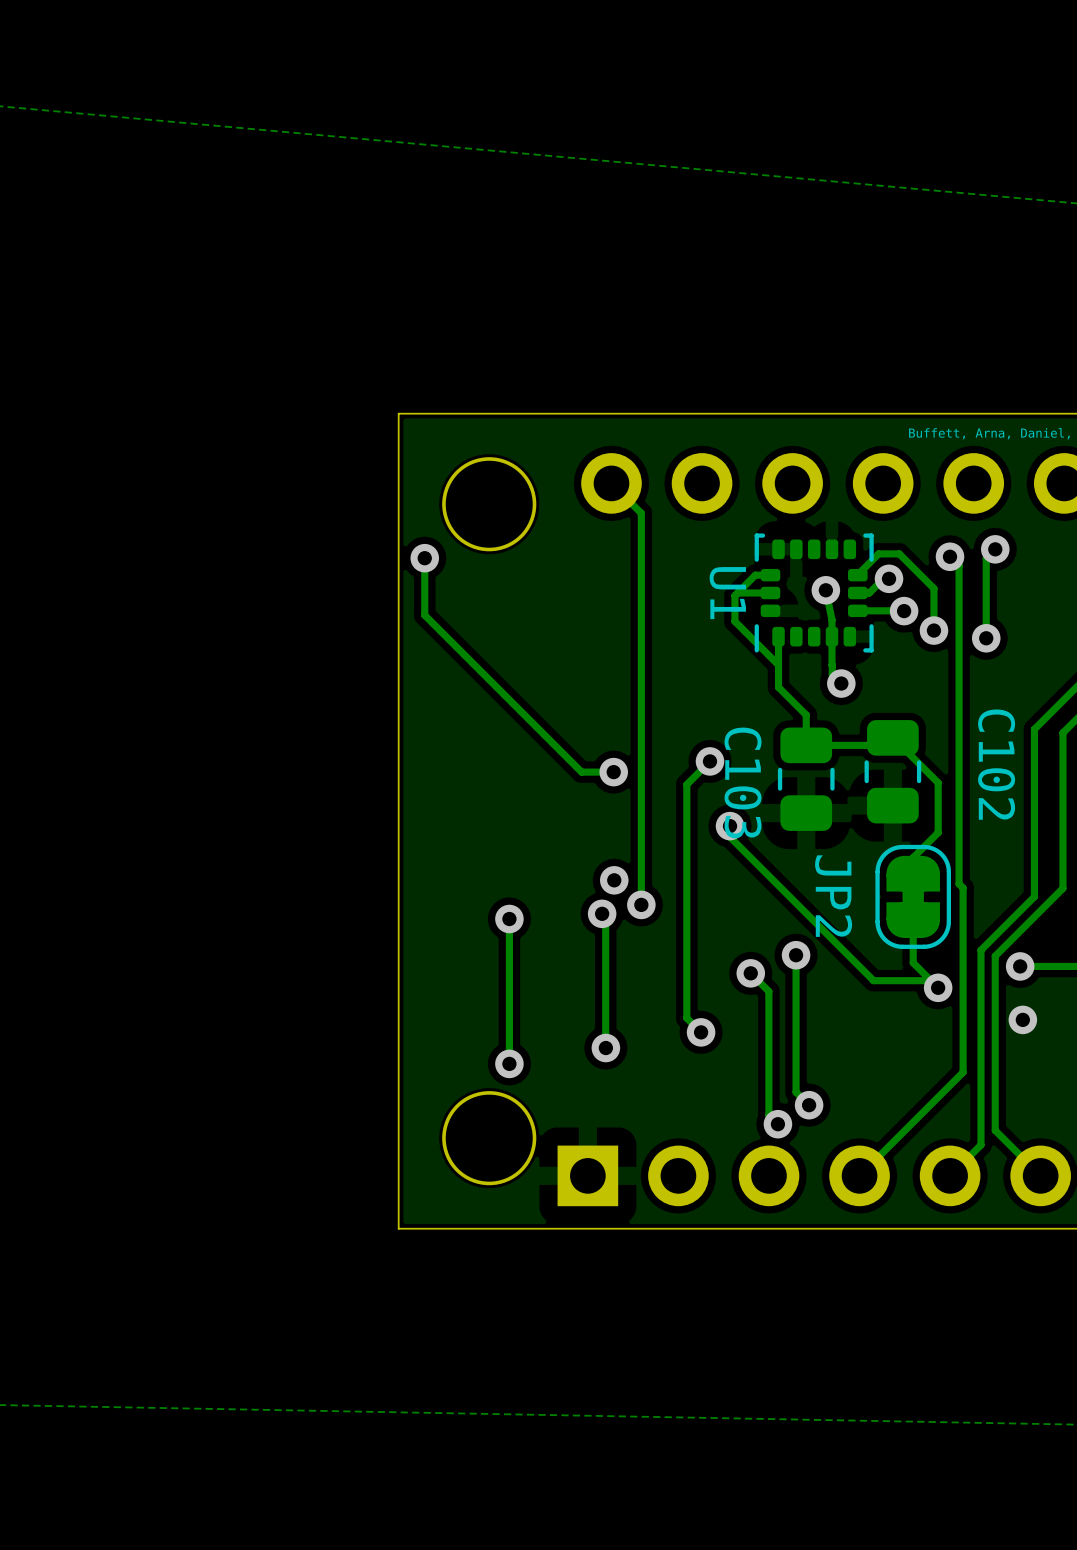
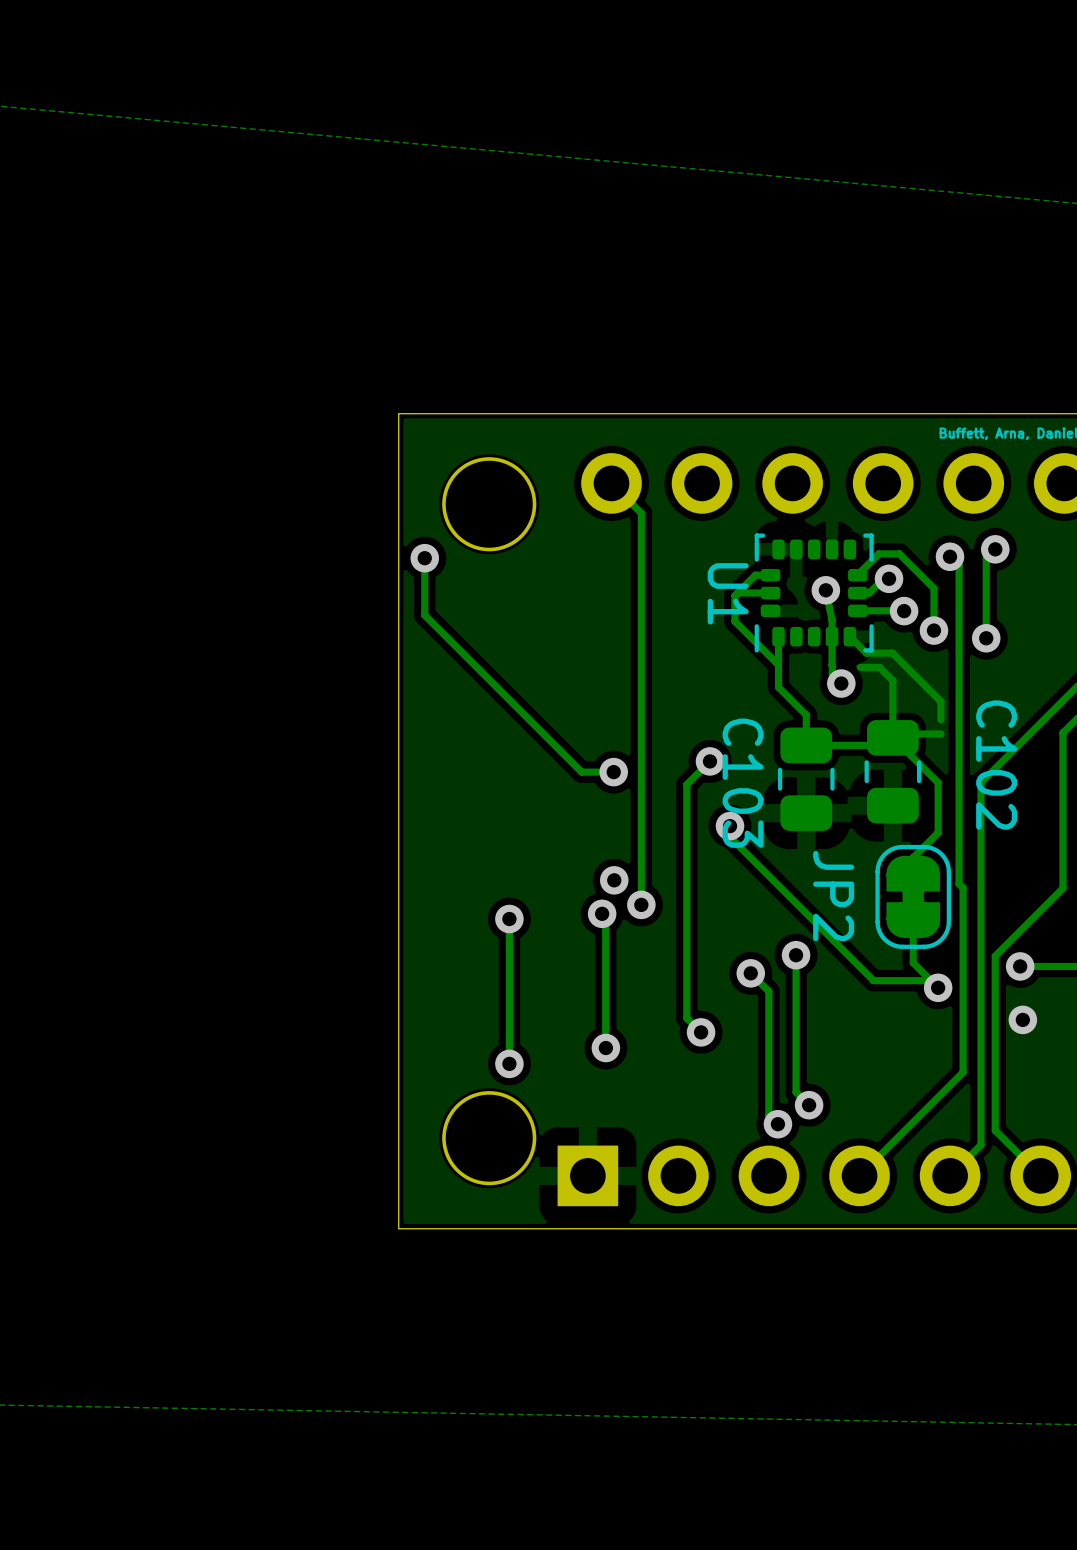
track: none -> (849, 636) (866, 653) (892, 653) (940, 701) (940, 719)
track: none -> (860, 667) (879, 667) (892, 680) (892, 737)
track: (1034, 729) (1034, 896) (980, 950) -> (1034, 729) (980, 782) (980, 950)
track: none -> (940, 734) (917, 734) (913, 737) (893, 737)

